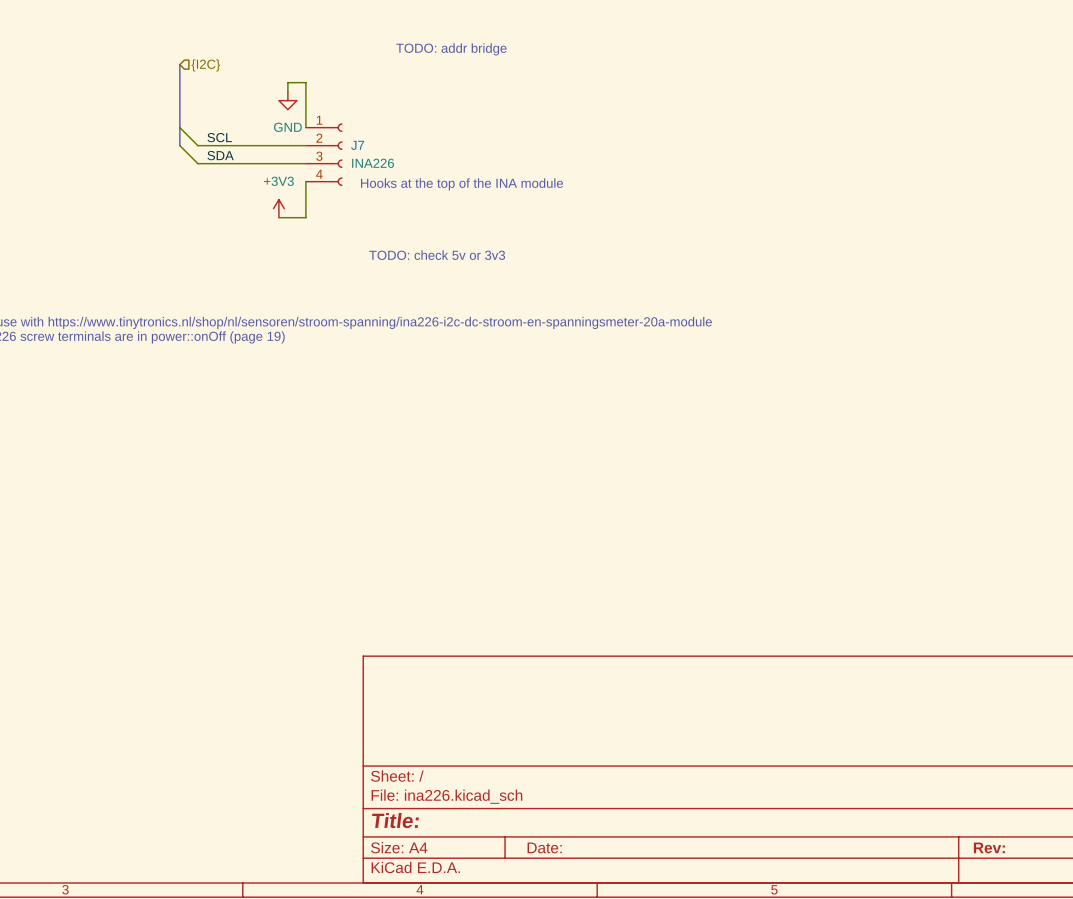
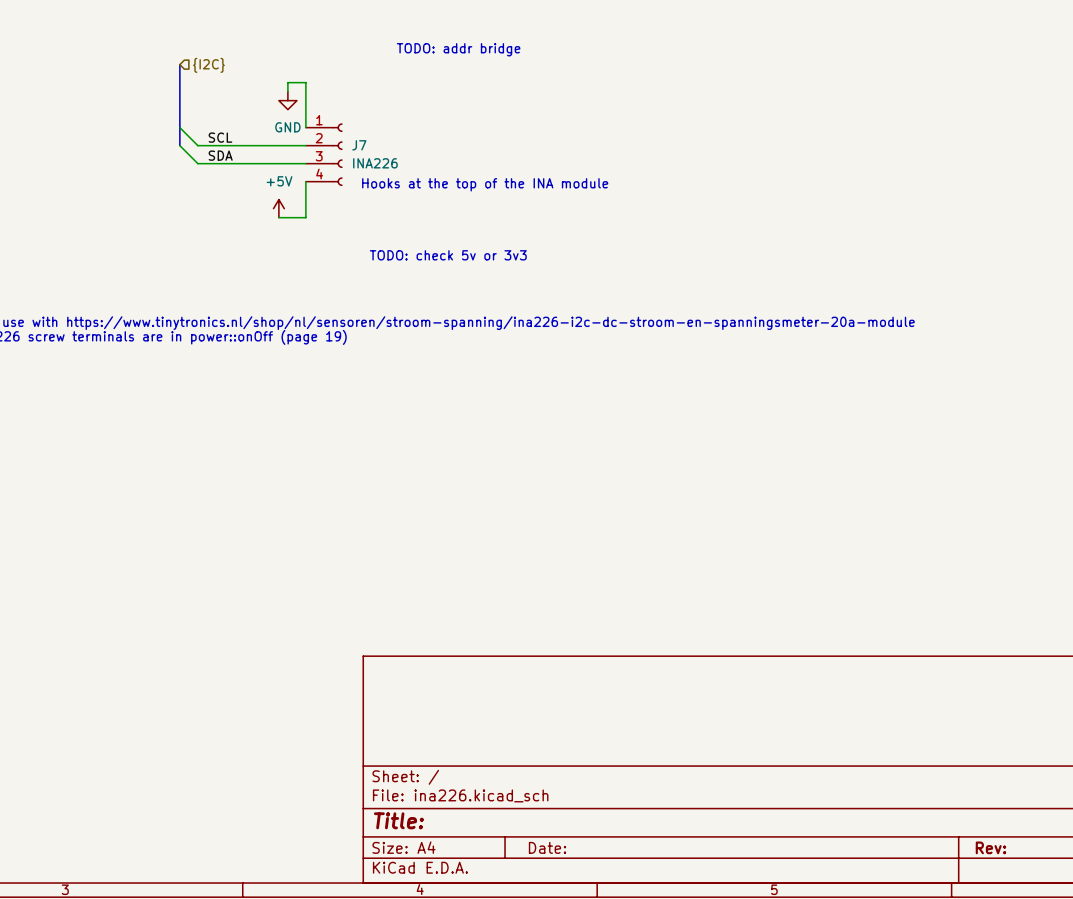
power symbol: +3V3 (278, 208) -> +5V (278, 208)

